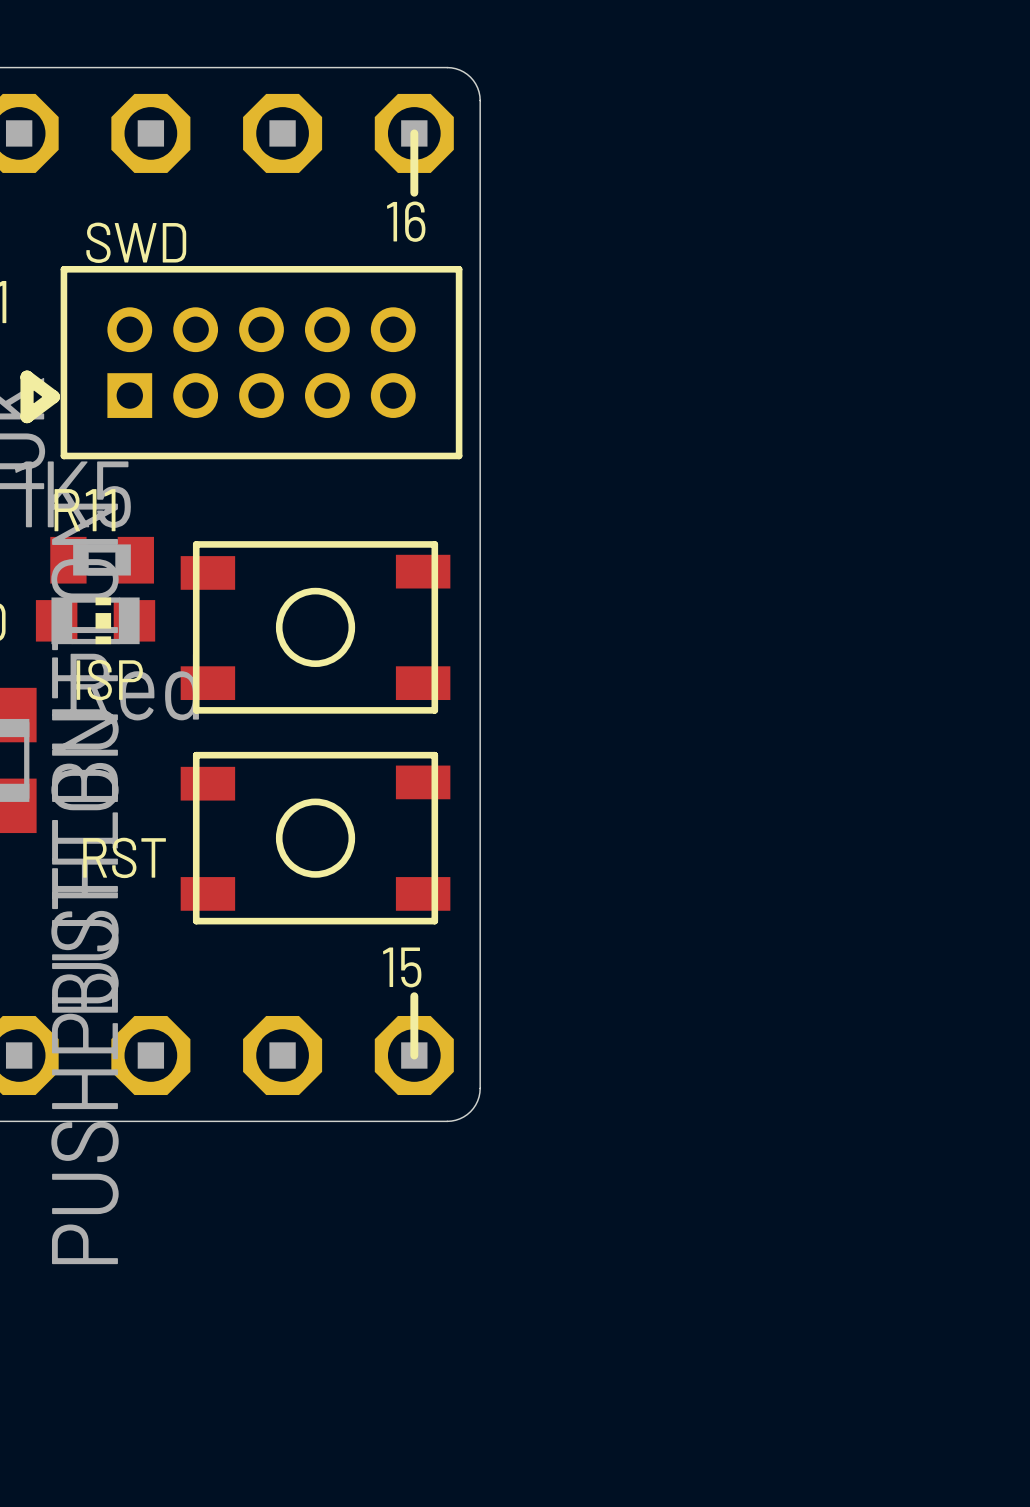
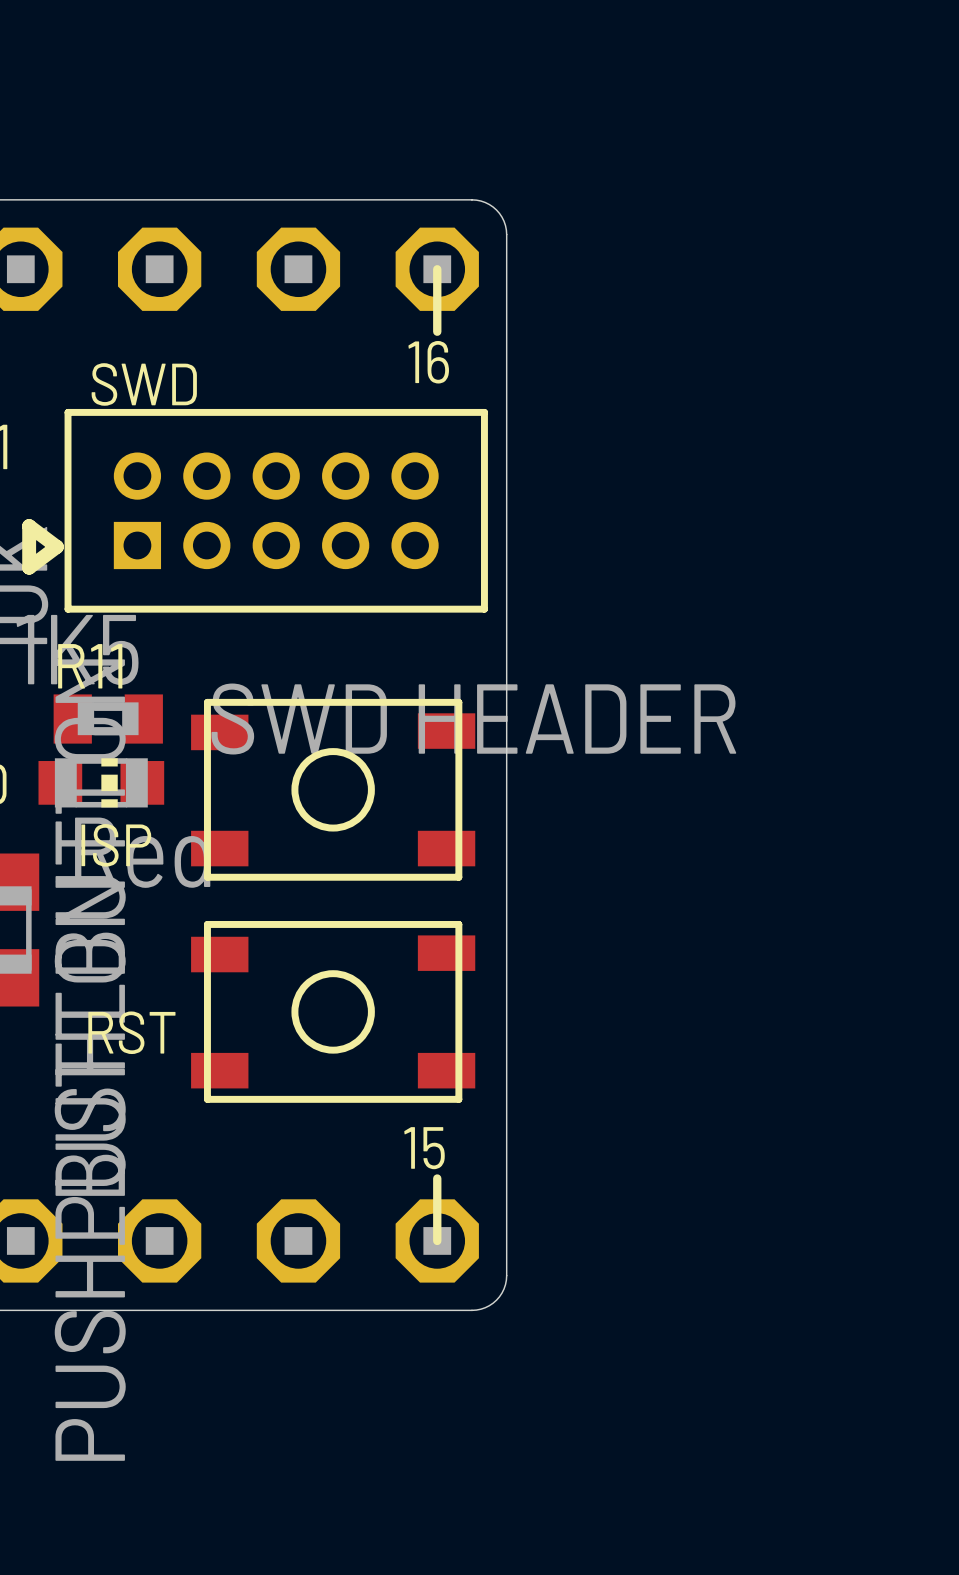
part value: none -> SWD HEADER (473, 719)

